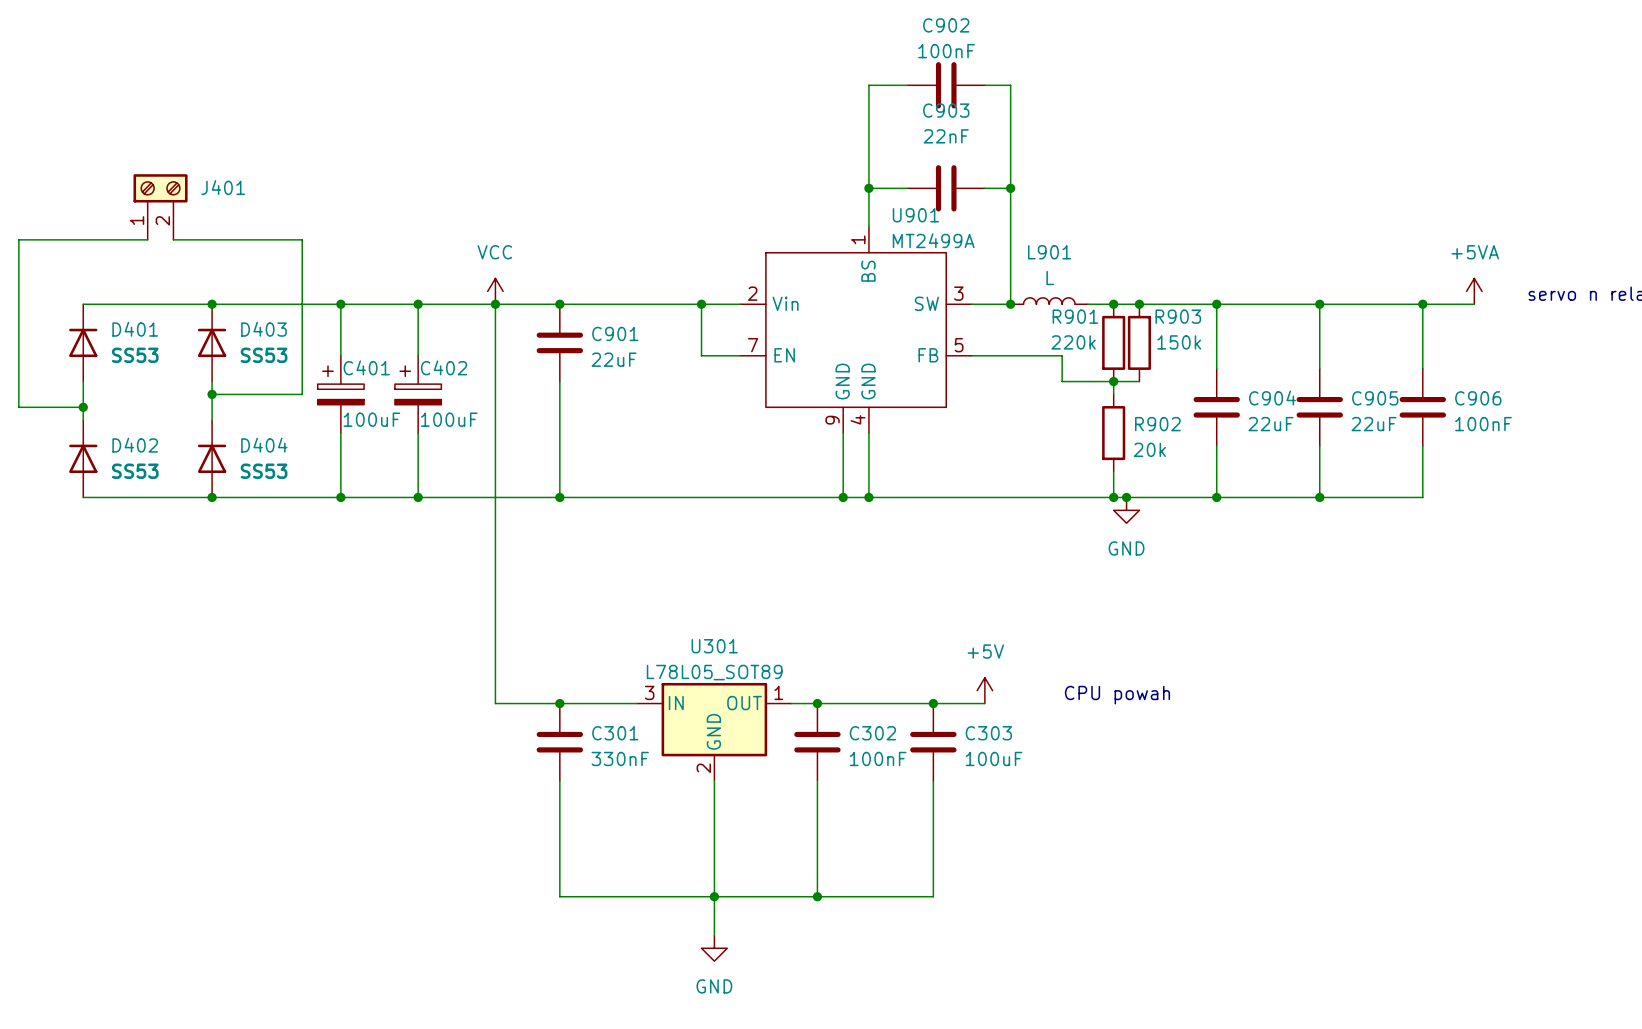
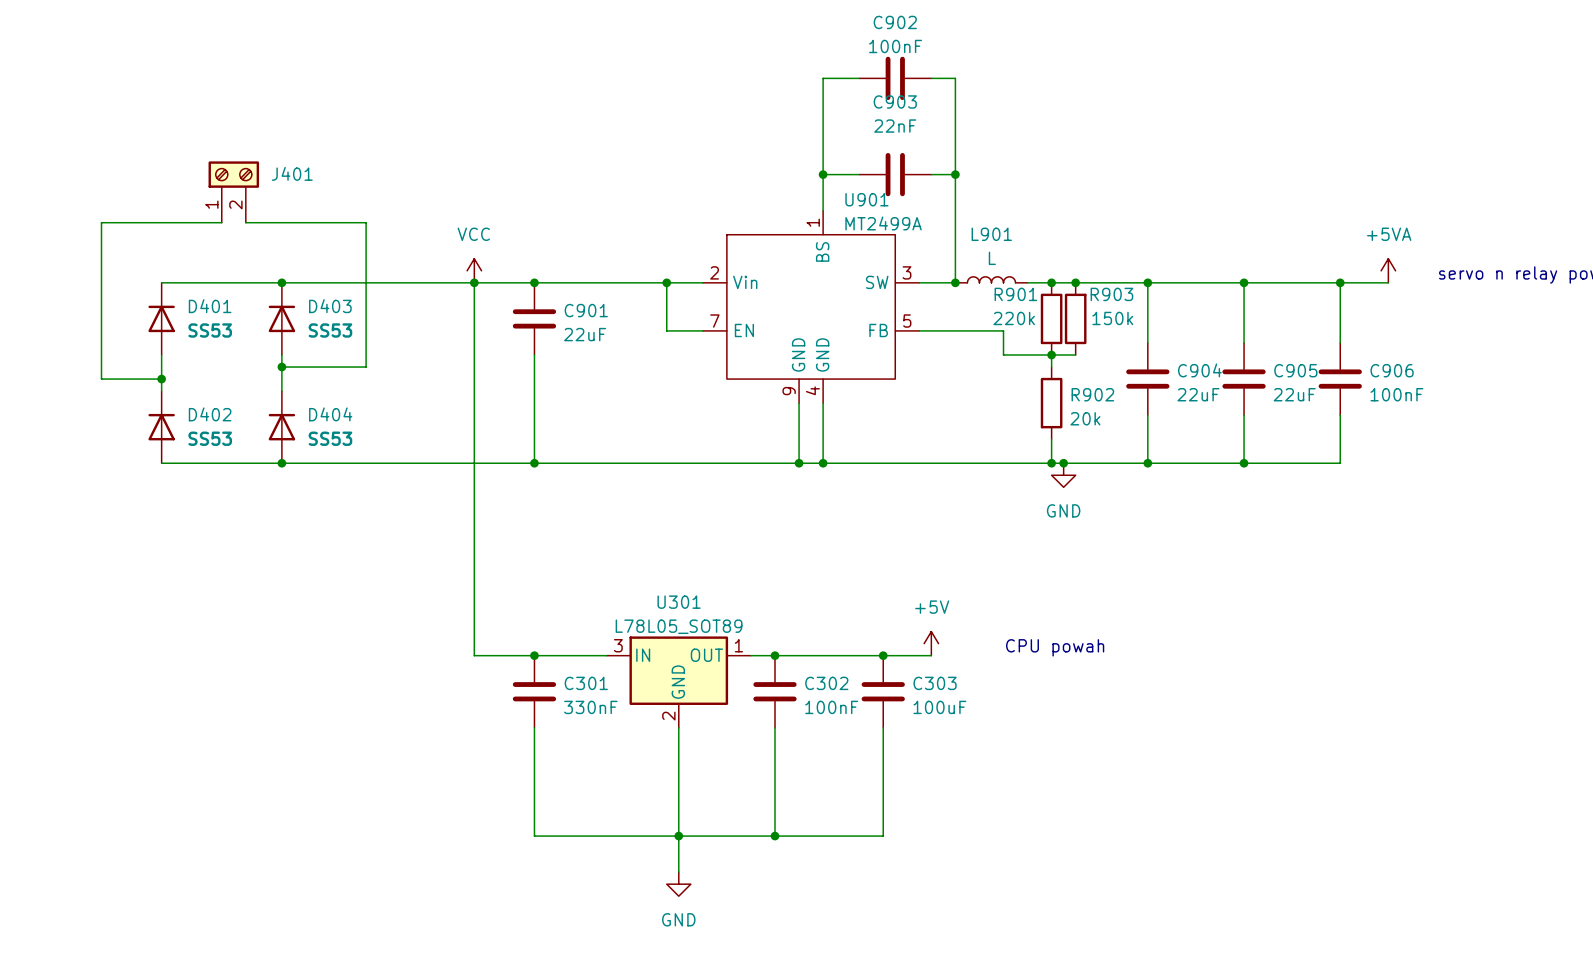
J401 position: (160, 207) -> (233, 192)
wire: (96, 239) (18, 239) (18, 407) (83, 407) -> (101, 222) (101, 379) (161, 379)
wire: (224, 239) (250, 239) -> (149, 222) (173, 222)
wire: (302, 239) (302, 394) -> (293, 222) (366, 222) (366, 367) (293, 367)
wire: (83, 304) (160, 304) -> none
junction: (212, 304) -> none
junction: none -> (281, 282)
wire: (340, 304) (340, 355) -> none
junction: (340, 304) -> none
wire: (418, 304) (418, 355) -> none
junction: (418, 304) -> none
D401 position: (83, 342) -> (161, 318)
D403 position: (212, 342) -> (281, 318)
wire: (83, 381) (83, 420) -> (161, 355) (161, 391)
wire: (212, 381) (212, 420) -> (281, 355) (281, 391)
wire: (212, 394) (289, 394) -> none
junction: (212, 394) -> none
junction: none -> (281, 367)
C401: 100uF (340, 394) -> none
C402: 100uF (418, 394) -> none
junction: (83, 407) -> none
junction: none -> (161, 379)
wire: (340, 433) (340, 497) -> none
wire: (418, 433) (418, 497) -> none
D402 position: (83, 458) -> (161, 427)
D404 position: (212, 458) -> (281, 427)
wire: (83, 497) (160, 497) -> none
junction: (212, 497) -> none
junction: none -> (281, 463)
junction: (340, 497) -> none
junction: (418, 497) -> none

